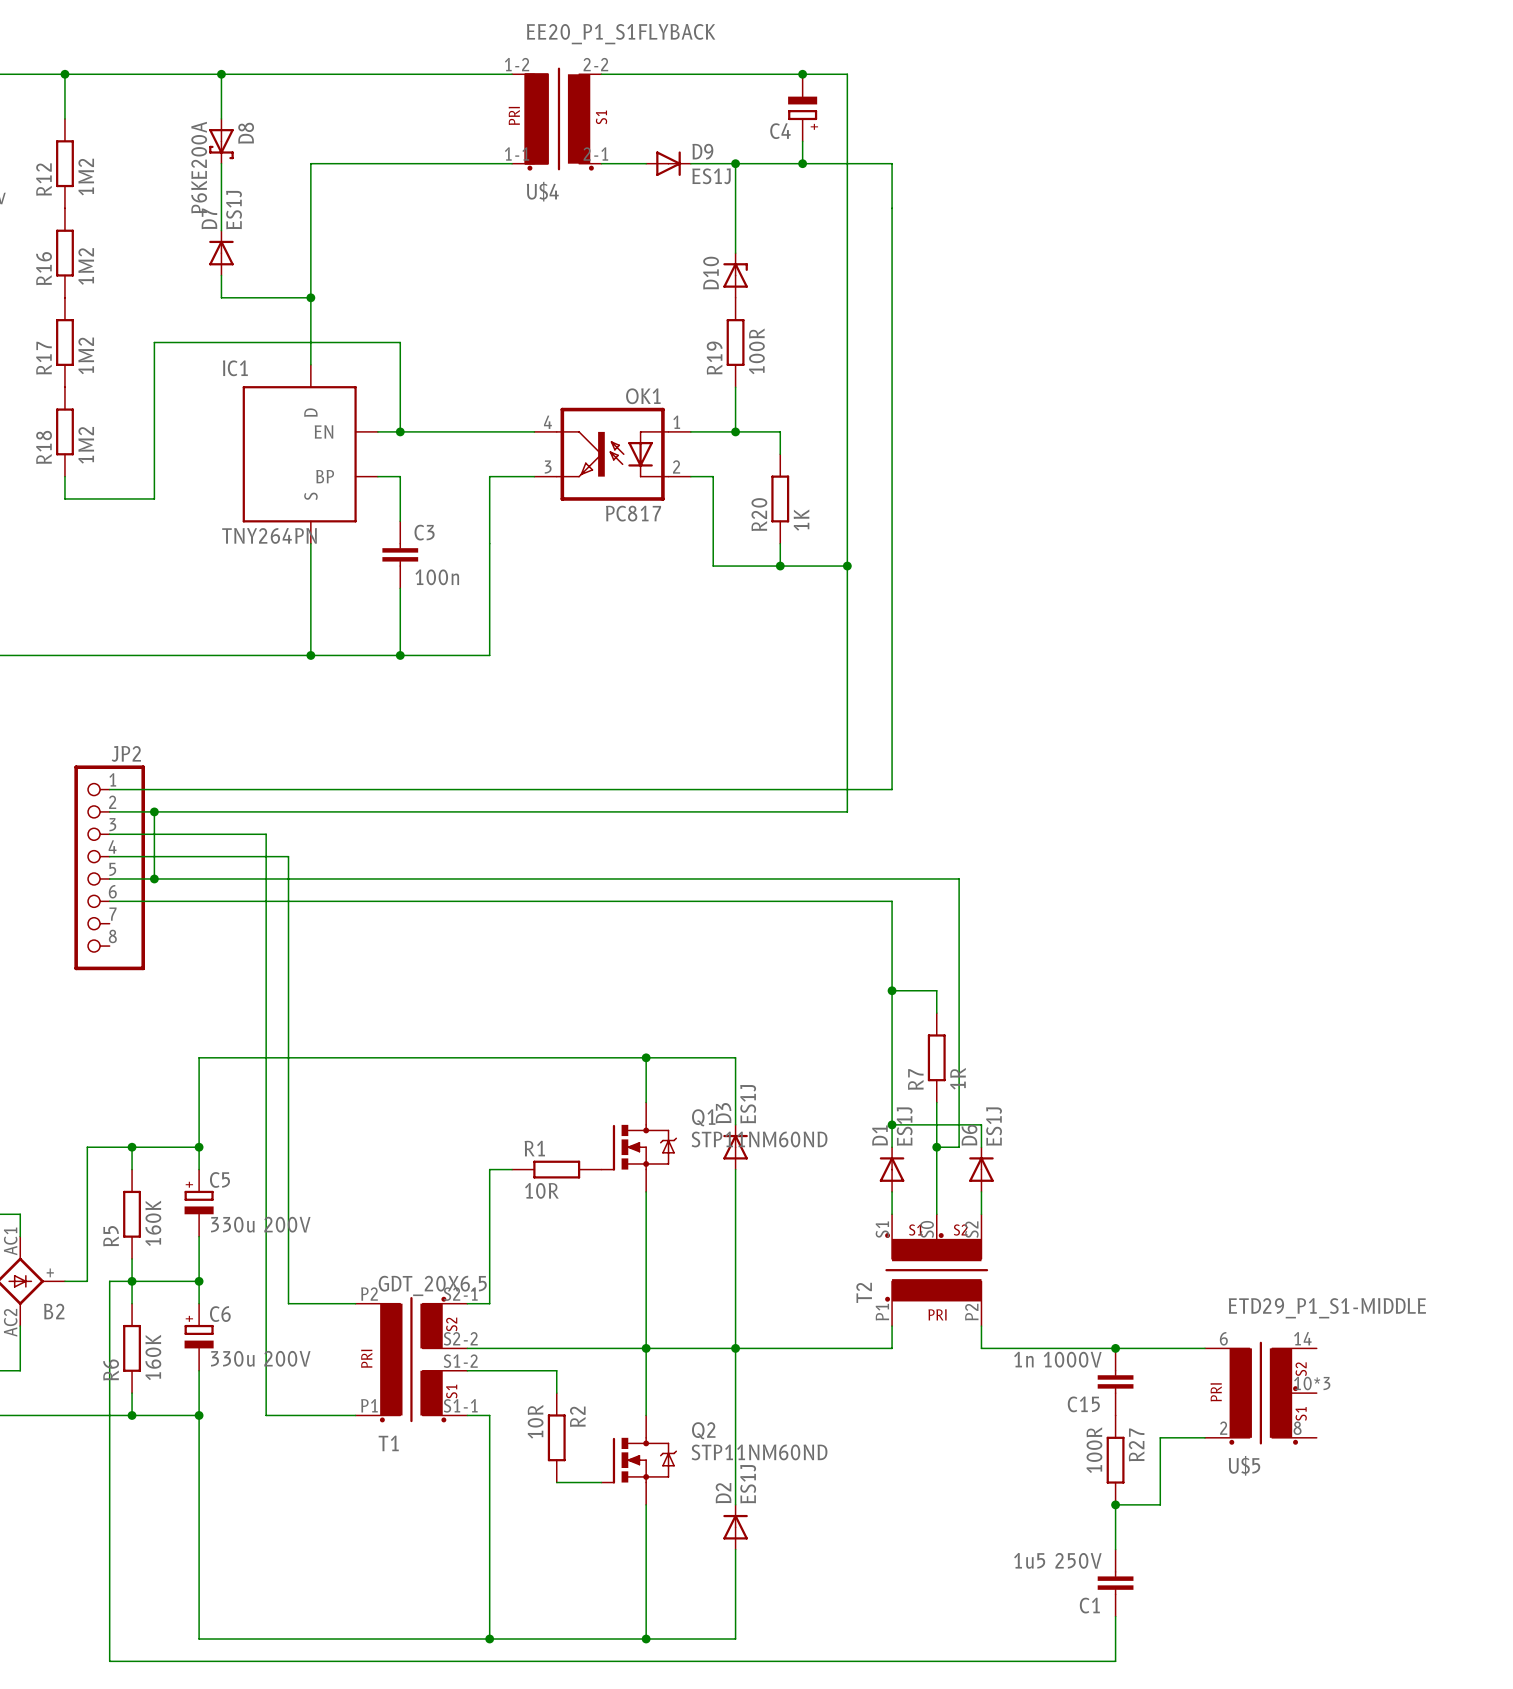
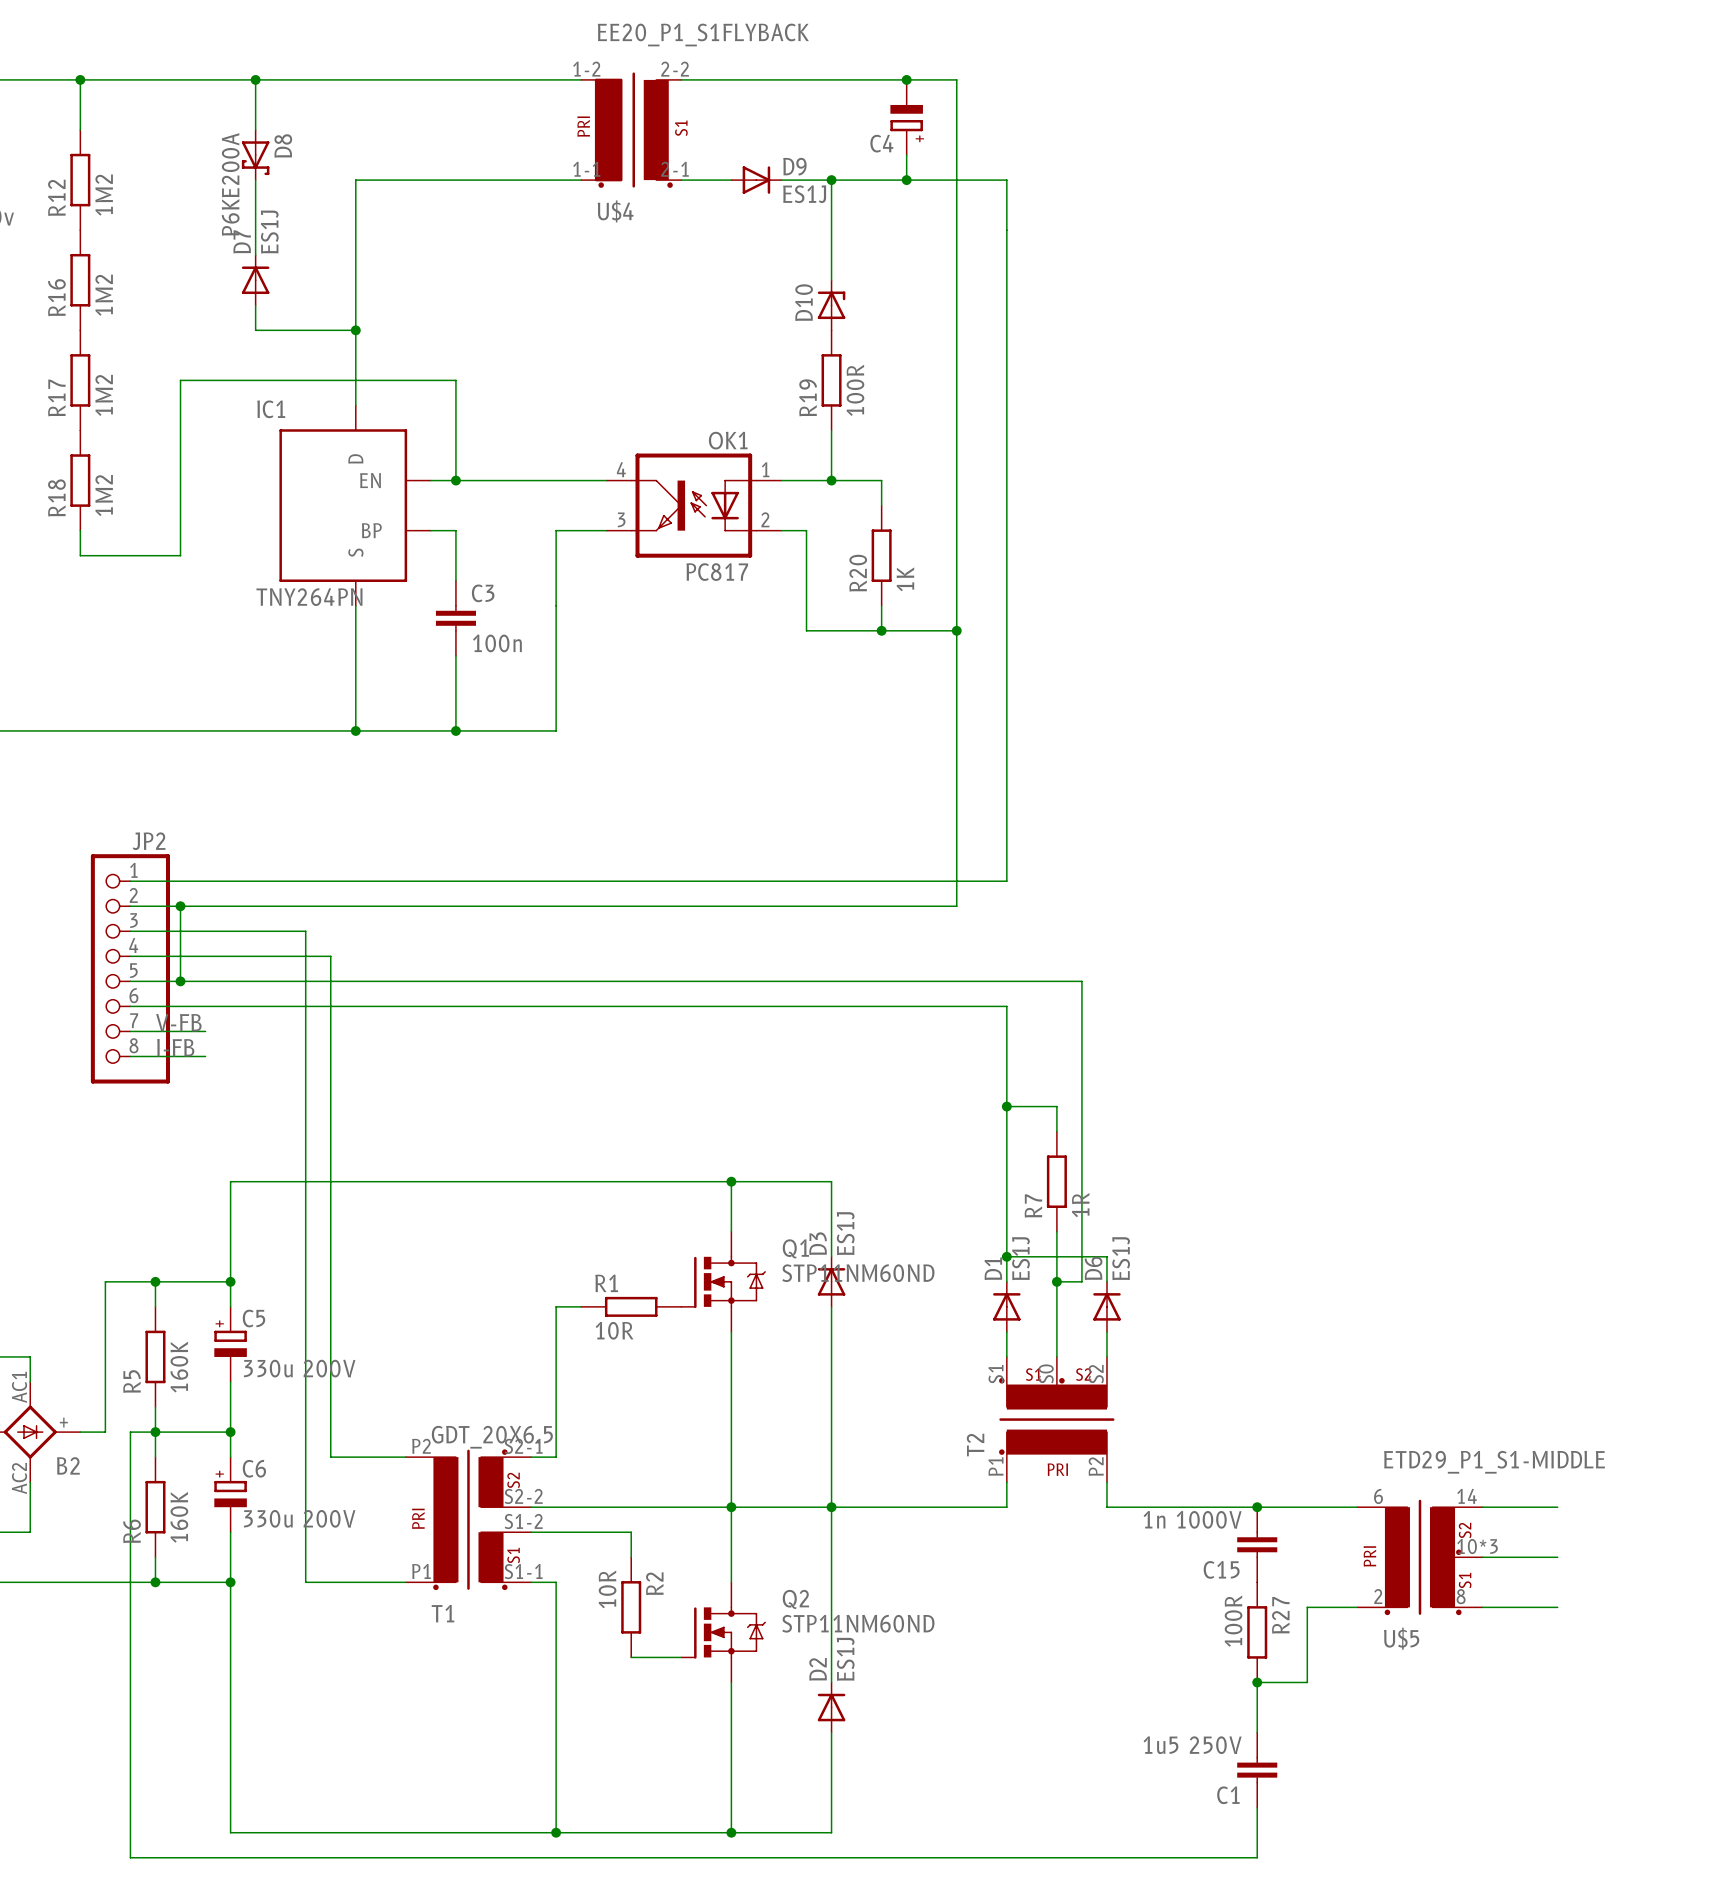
label: none -> V-FB (178, 1022)
wire: none -> (130, 1031) (205, 1031)
label: none -> I-FB (175, 1047)
wire: none -> (130, 1056) (205, 1056)
wire: none -> (1482, 1507) (1557, 1507)
wire: none -> (1482, 1557) (1557, 1557)
wire: none -> (1482, 1607) (1557, 1607)

